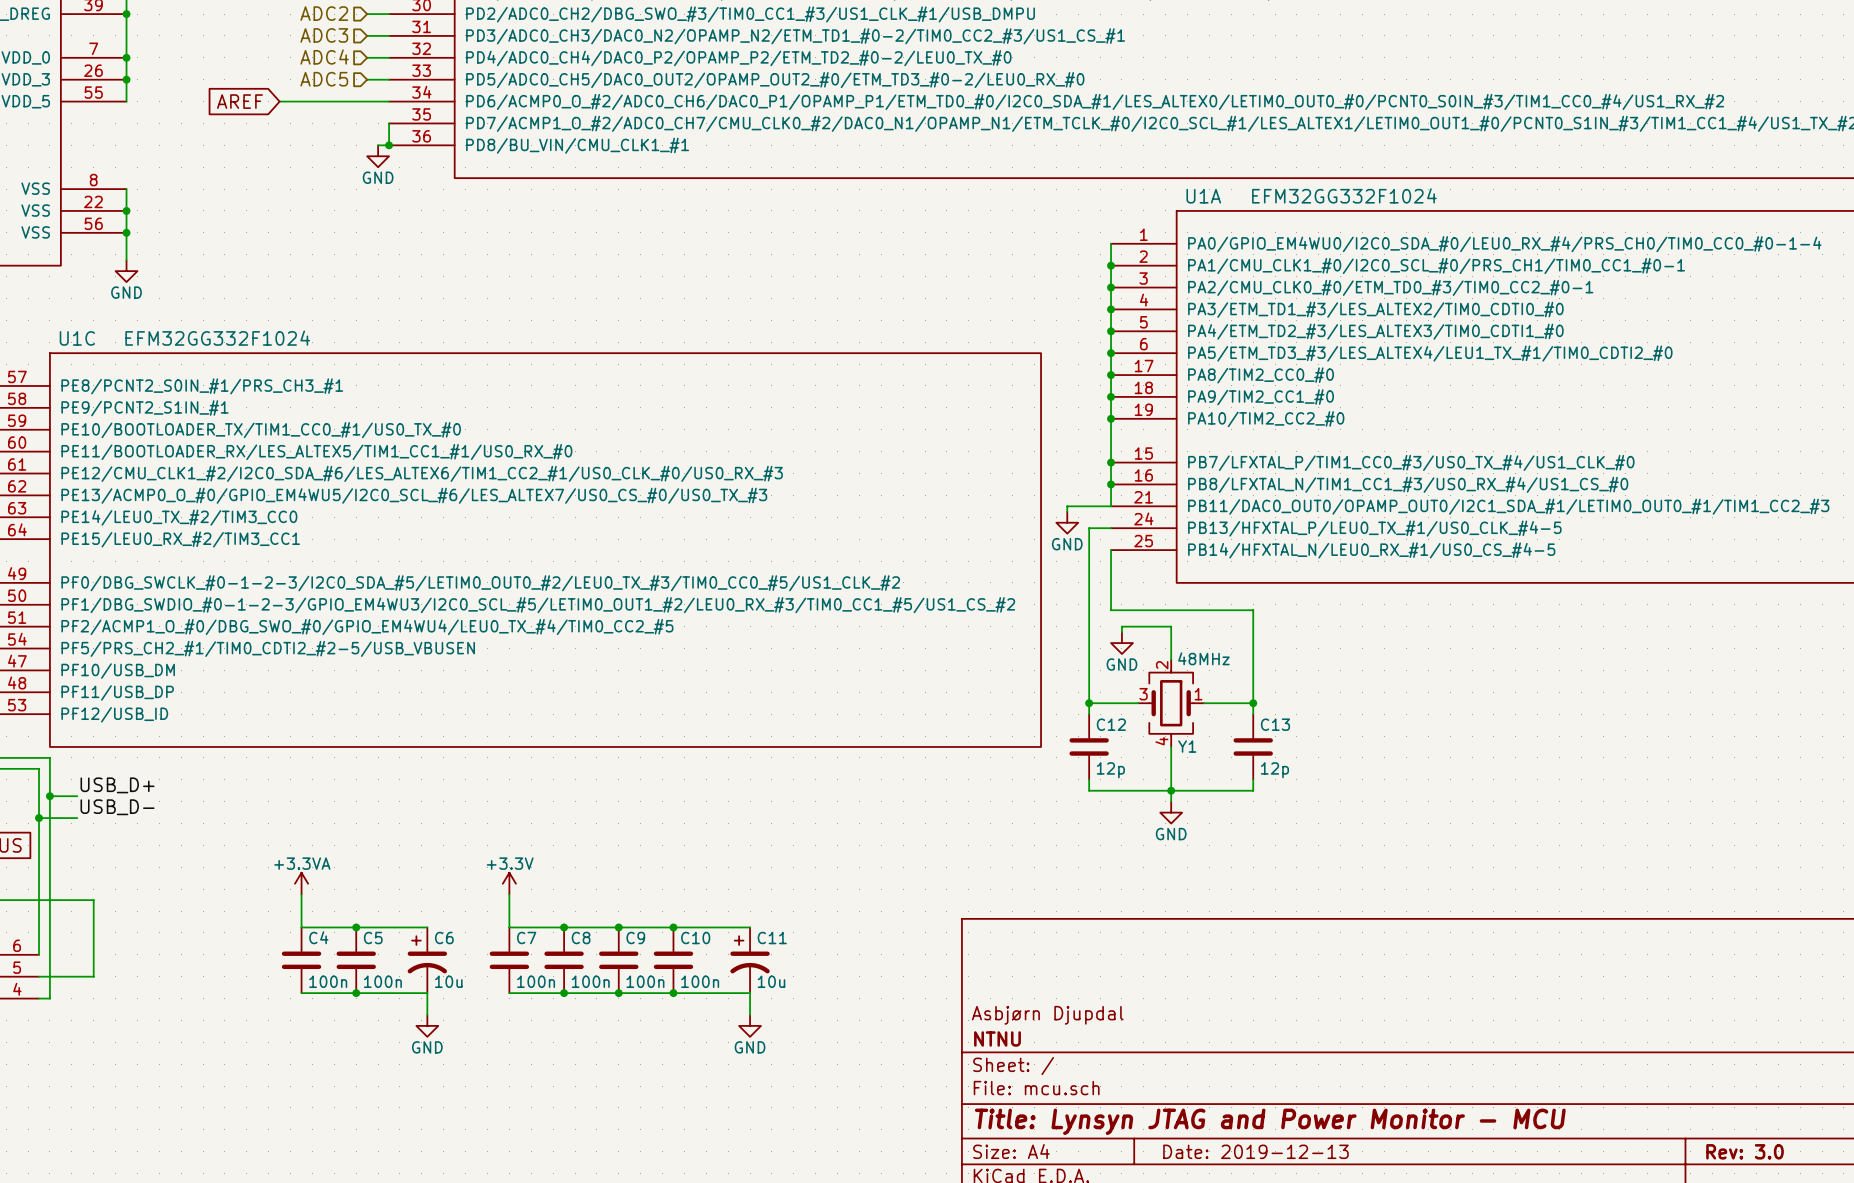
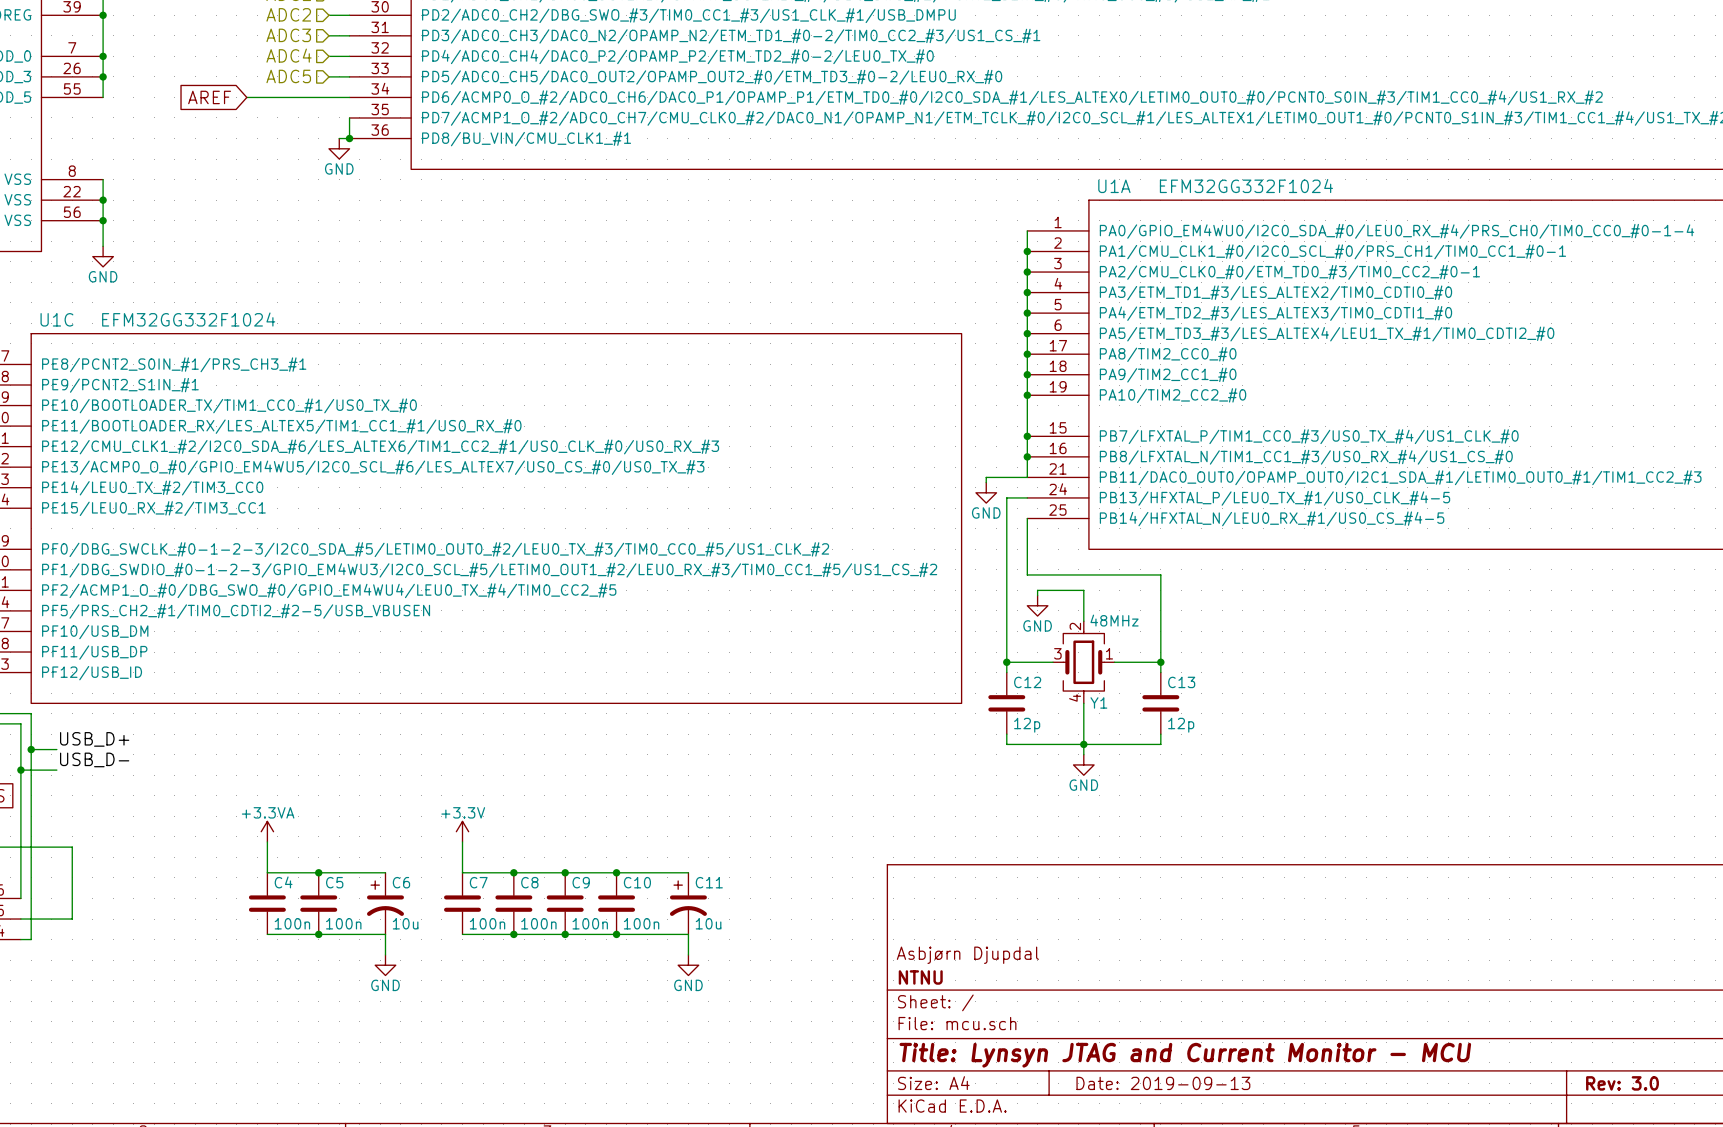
title block: Title: Lynsyn JTAG and Power Monitor - MCU (1270, 1121) -> Title: Lynsyn JTAG and Current Monitor - MCU (1185, 1055)
title block: Date: 2019-12-13 (1255, 1151) -> Date: 2019-09-13 (1163, 1083)

